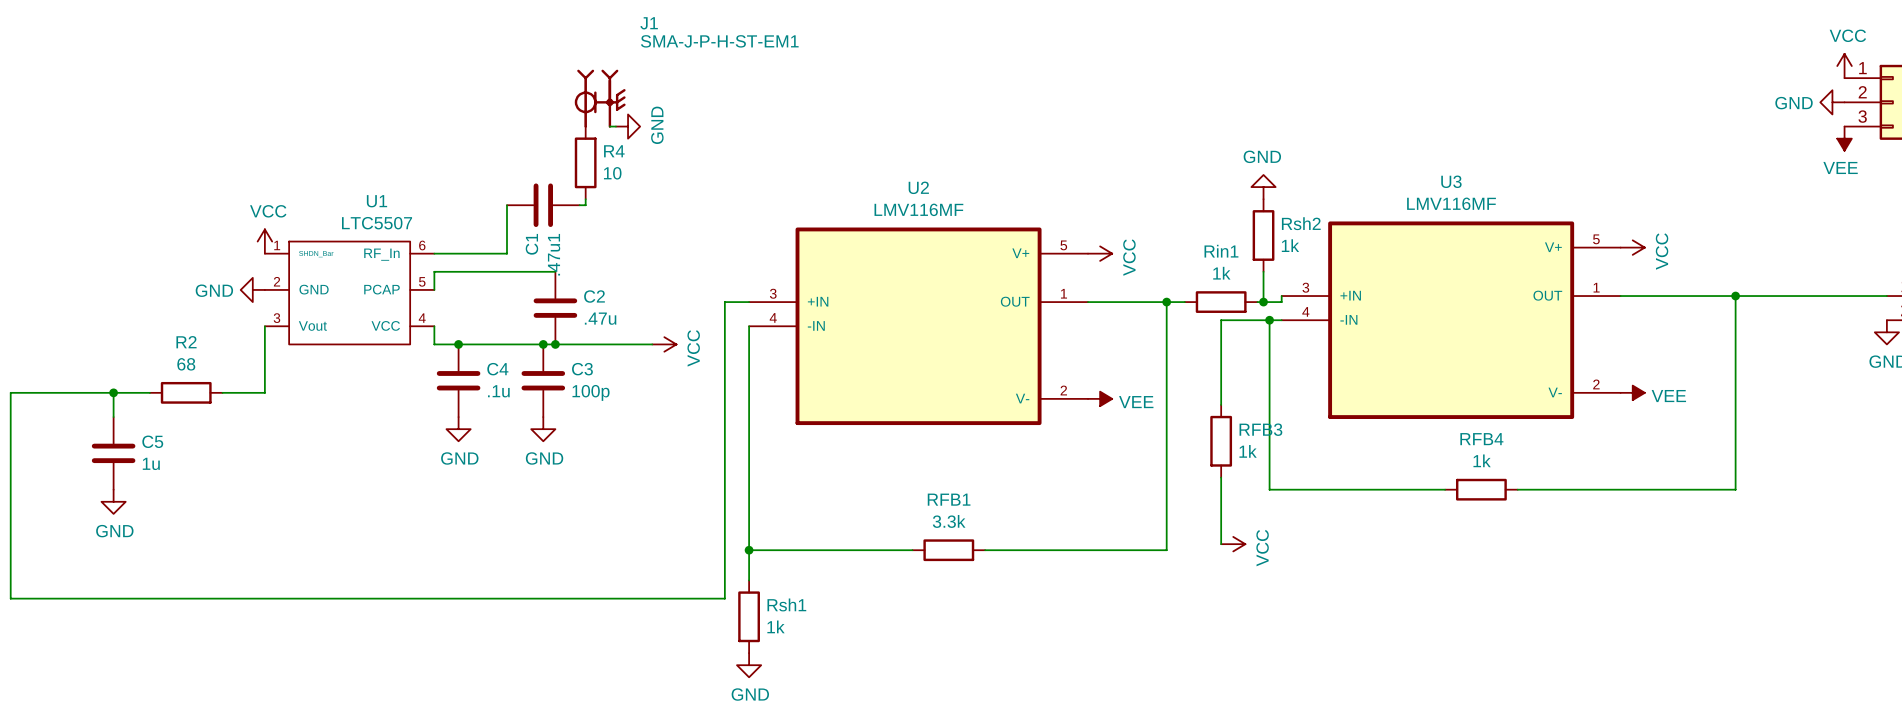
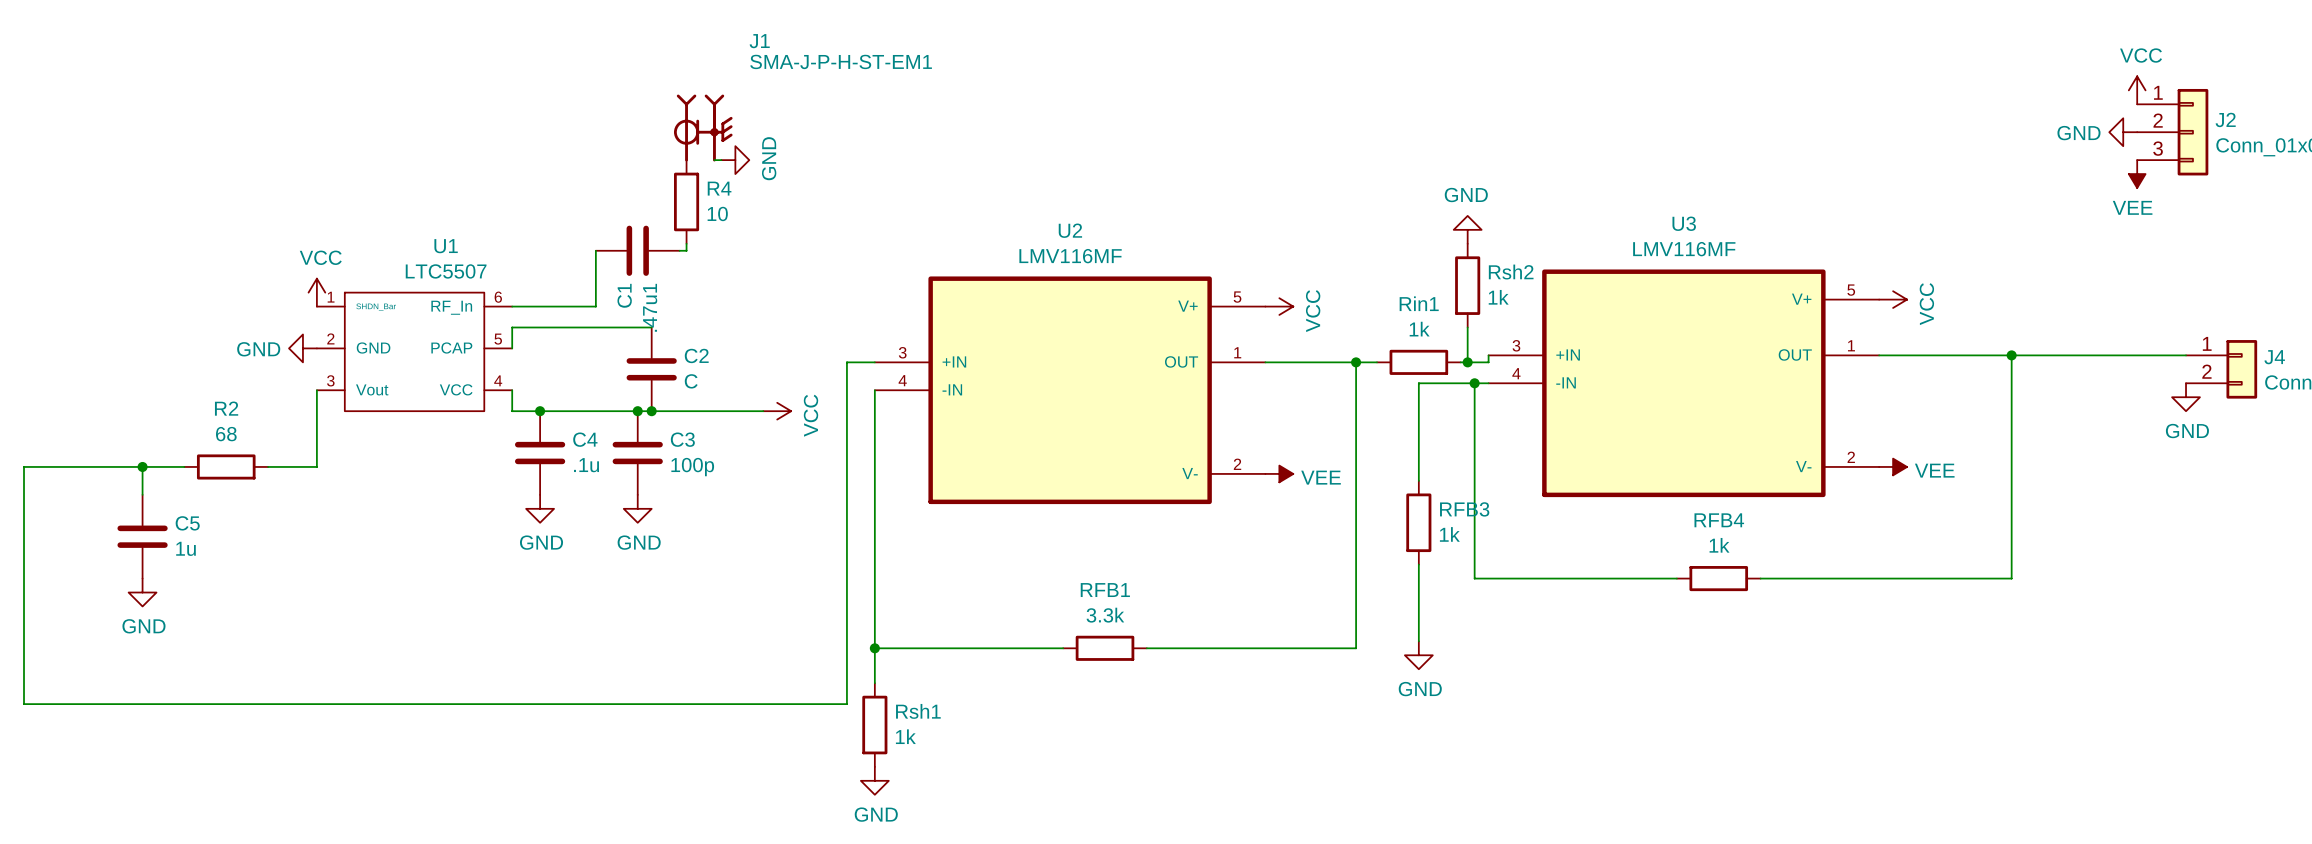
C2 value: .47u (600, 318) -> C (691, 381)
power symbol: VCC (1233, 544) -> none
power symbol: none -> GND (1418, 655)

